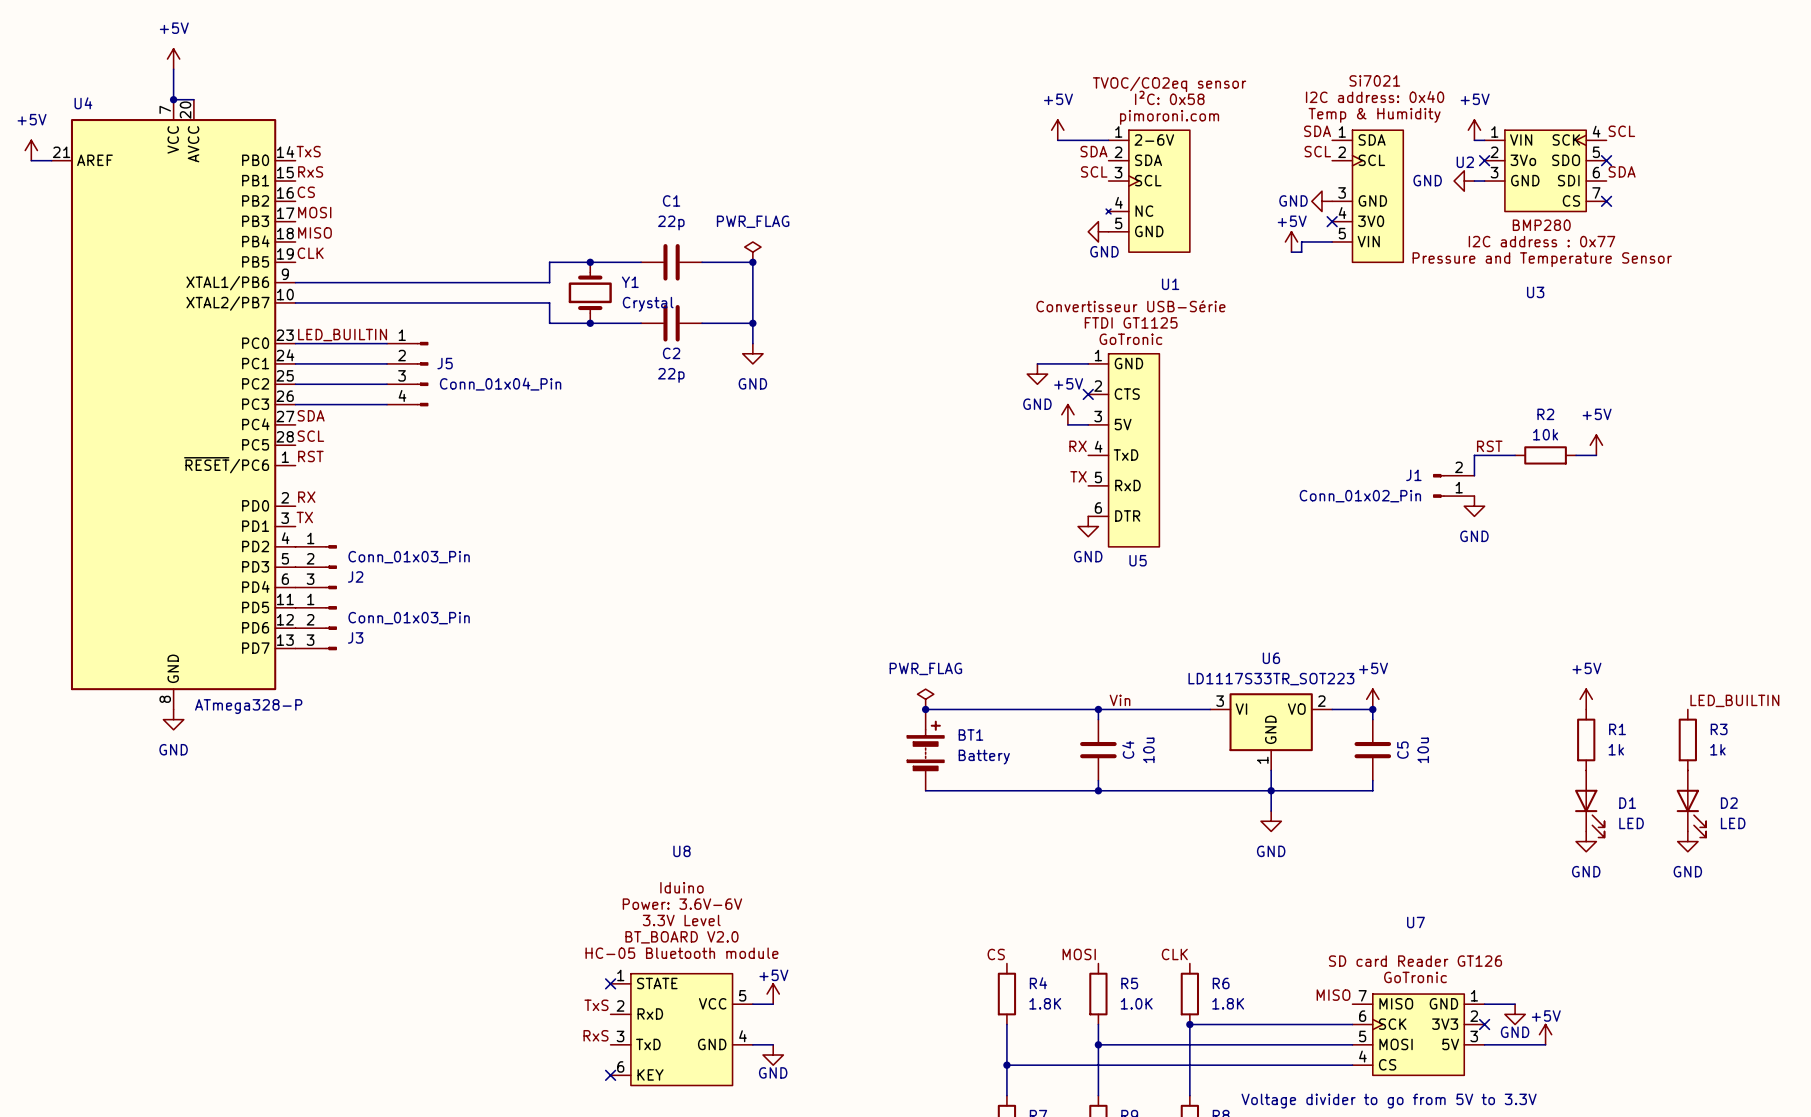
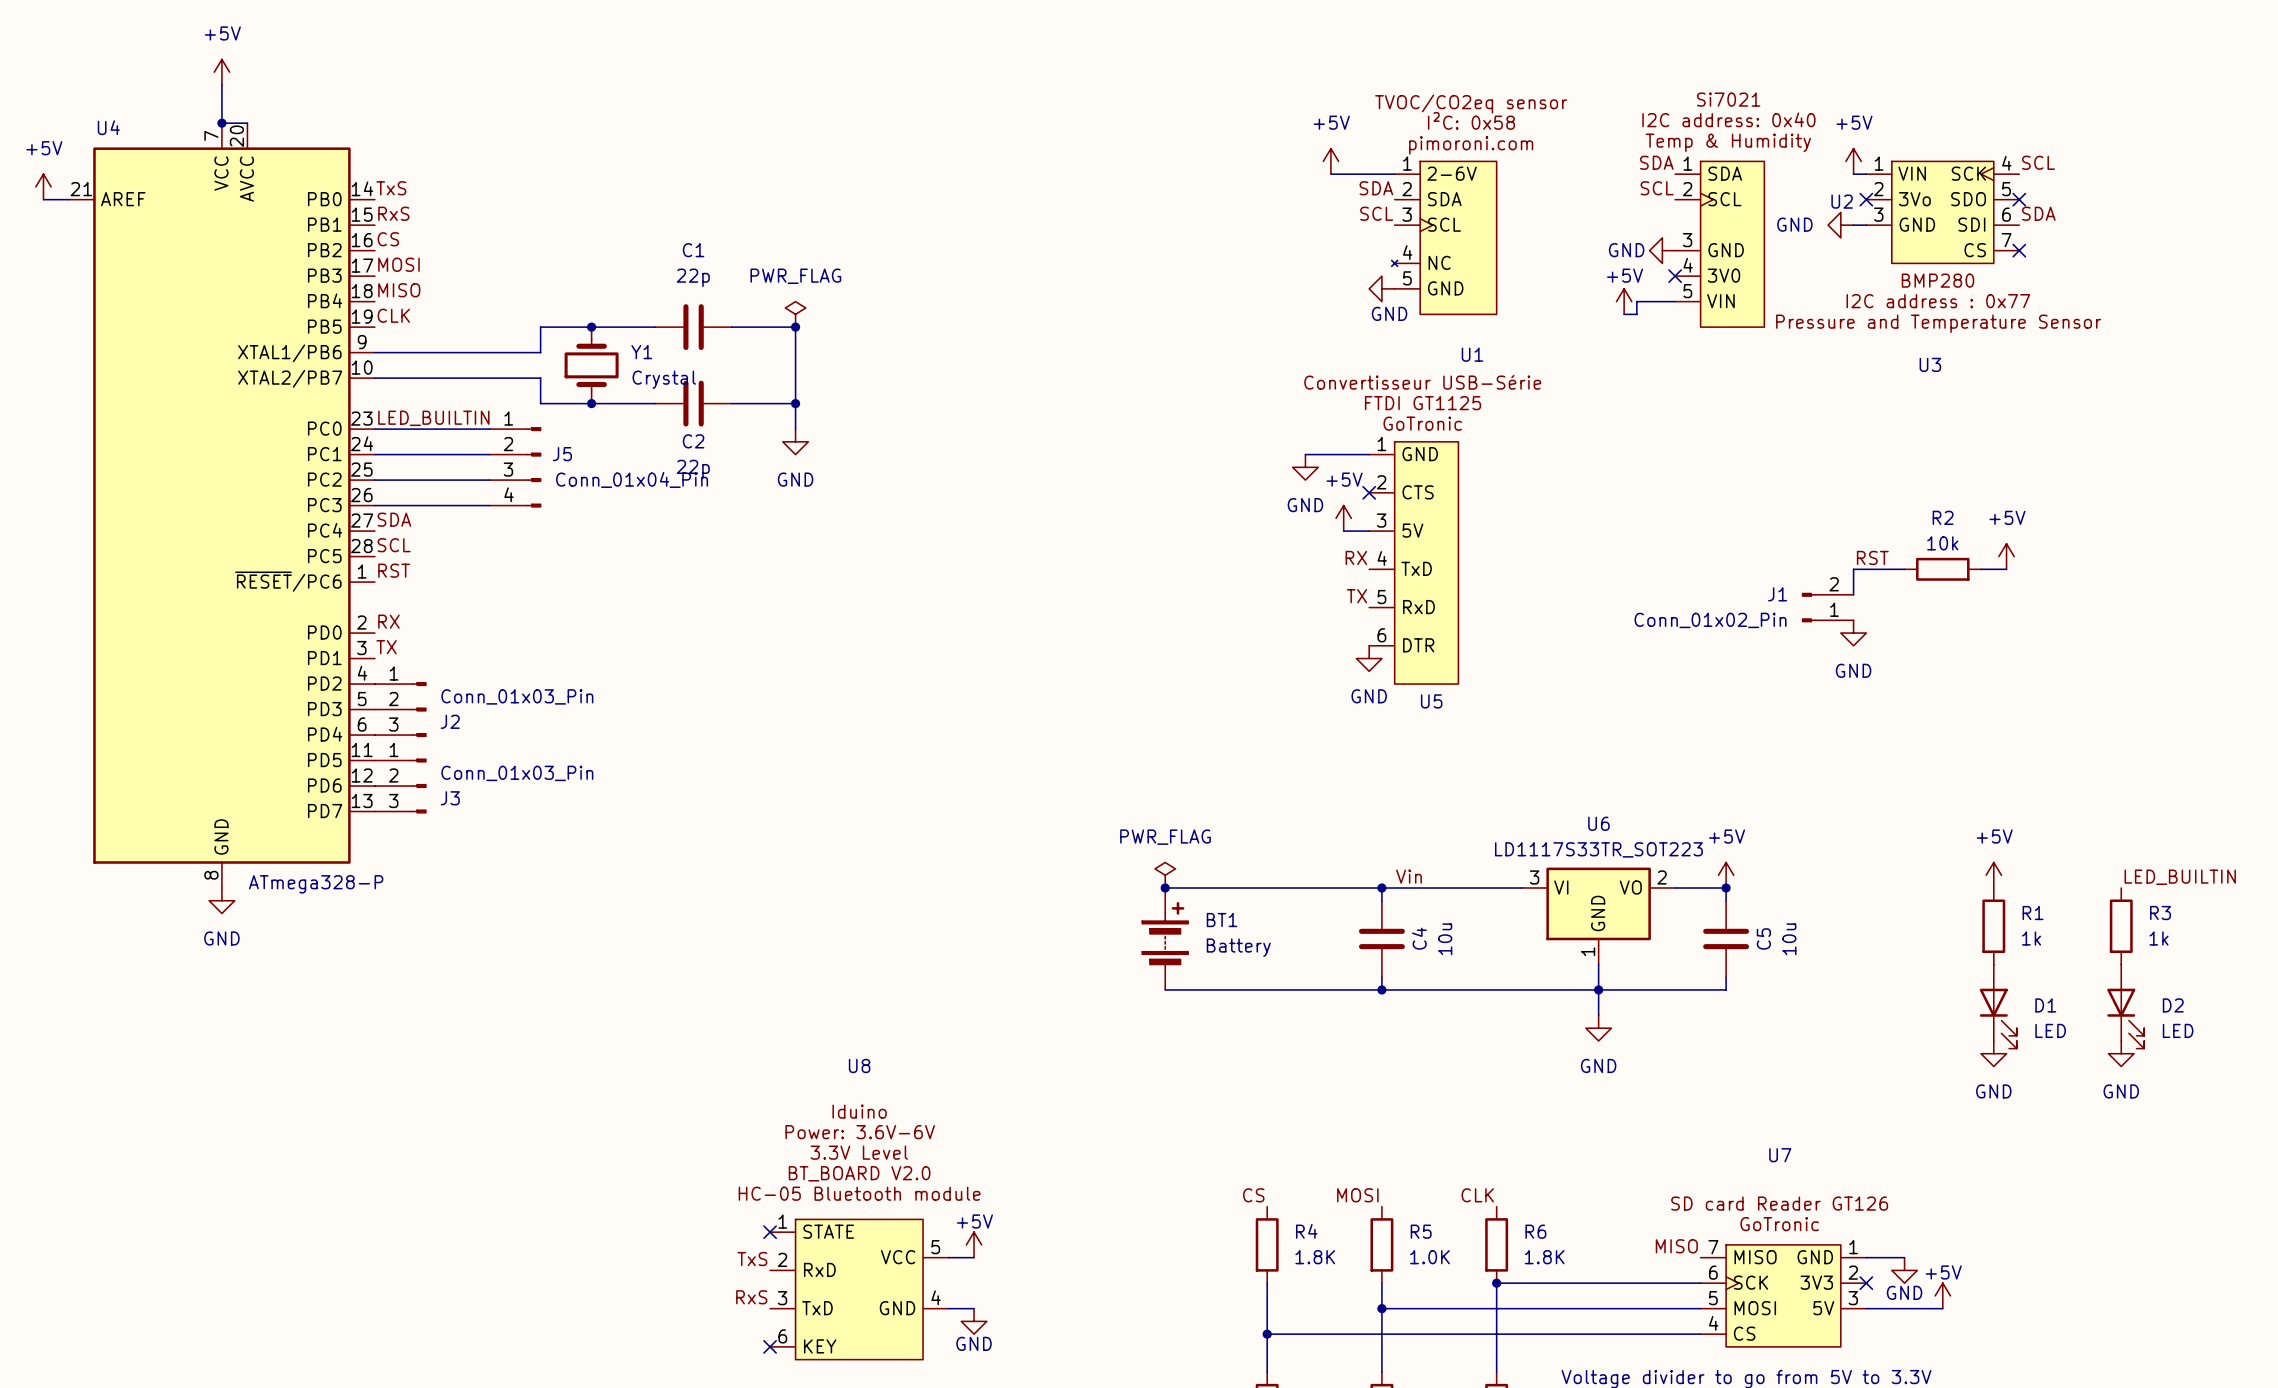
power symbol position: PWR_FLAG (752, 252) -> PWR_FLAG (795, 314)
junction: none -> (591, 327)
wire: (580, 262) (549, 262) (549, 282) (427, 282) -> (655, 327) (540, 327) (540, 352)
junction: (590, 262) -> none
wire: (630, 262) (641, 262) -> (795, 327) (795, 429)
junction: none -> (795, 327)
C1 position: (671, 262) -> (693, 327)
wire: (702, 262) (752, 262) (752, 343) -> none
junction: (752, 262) -> none
Y1 position: (590, 292) -> (591, 365)
wire: (427, 302) (549, 302) (549, 323) (580, 323) -> (540, 378) (540, 403) (655, 403)
junction: none -> (591, 403)
junction: (590, 323) -> none
wire: (630, 323) (641, 323) -> none
junction: none -> (795, 403)
C2 position: (671, 323) -> (693, 403)
wire: (702, 323) (752, 323) -> none
junction: (752, 323) -> none
power symbol position: GND (752, 353) -> GND (795, 441)

